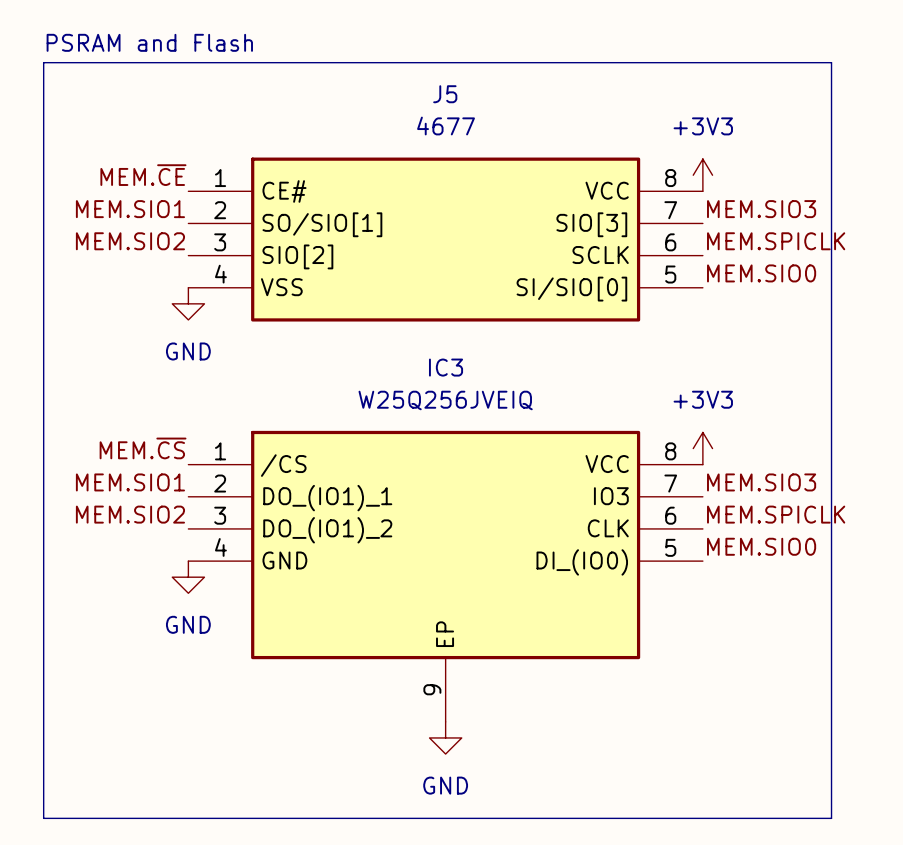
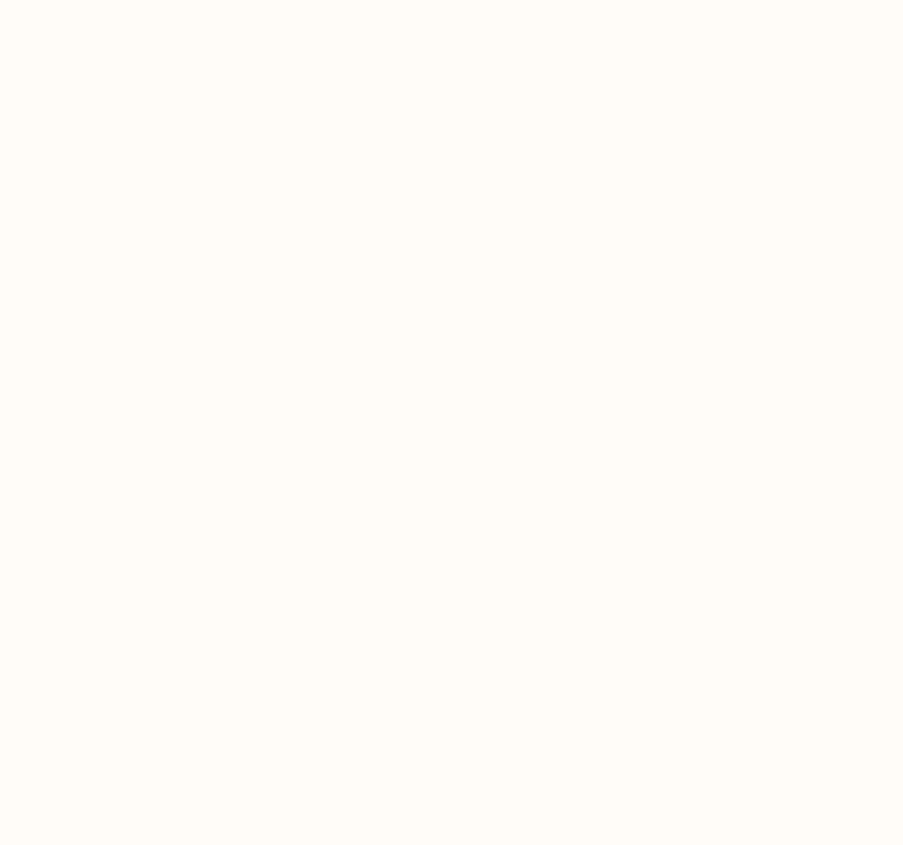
text: PSRAM and Flash (149, 42) -> none
line: (43, 62) (831, 62) (831, 818) (43, 818) (43, 62) -> none
label: MEM.~{CE} (143, 175) -> none
power symbol: +3V3 (702, 175) -> none
label: MEM.SIO1 (130, 209) -> none
label: MEM.SIO3 (761, 209) -> none
J5: 4677 (445, 239) -> none
label: MEM.SIO2 (130, 241) -> none
label: MEM.SPICLK (776, 241) -> none
label: MEM.SIO0 (761, 273) -> none
power symbol: GND (188, 303) -> none
label: MEM.~{CS} (143, 448) -> none
power symbol: +3V3 (702, 448) -> none
label: MEM.SIO1 (130, 482) -> none
label: MEM.SIO3 (761, 482) -> none
label: MEM.SIO2 (130, 514) -> none
label: MEM.SPICLK (776, 514) -> none
label: MEM.SIO0 (761, 546) -> none
IC3: W25Q256JVEIQ (445, 576) -> none
power symbol: GND (188, 577) -> none
power symbol: GND (445, 737) -> none

